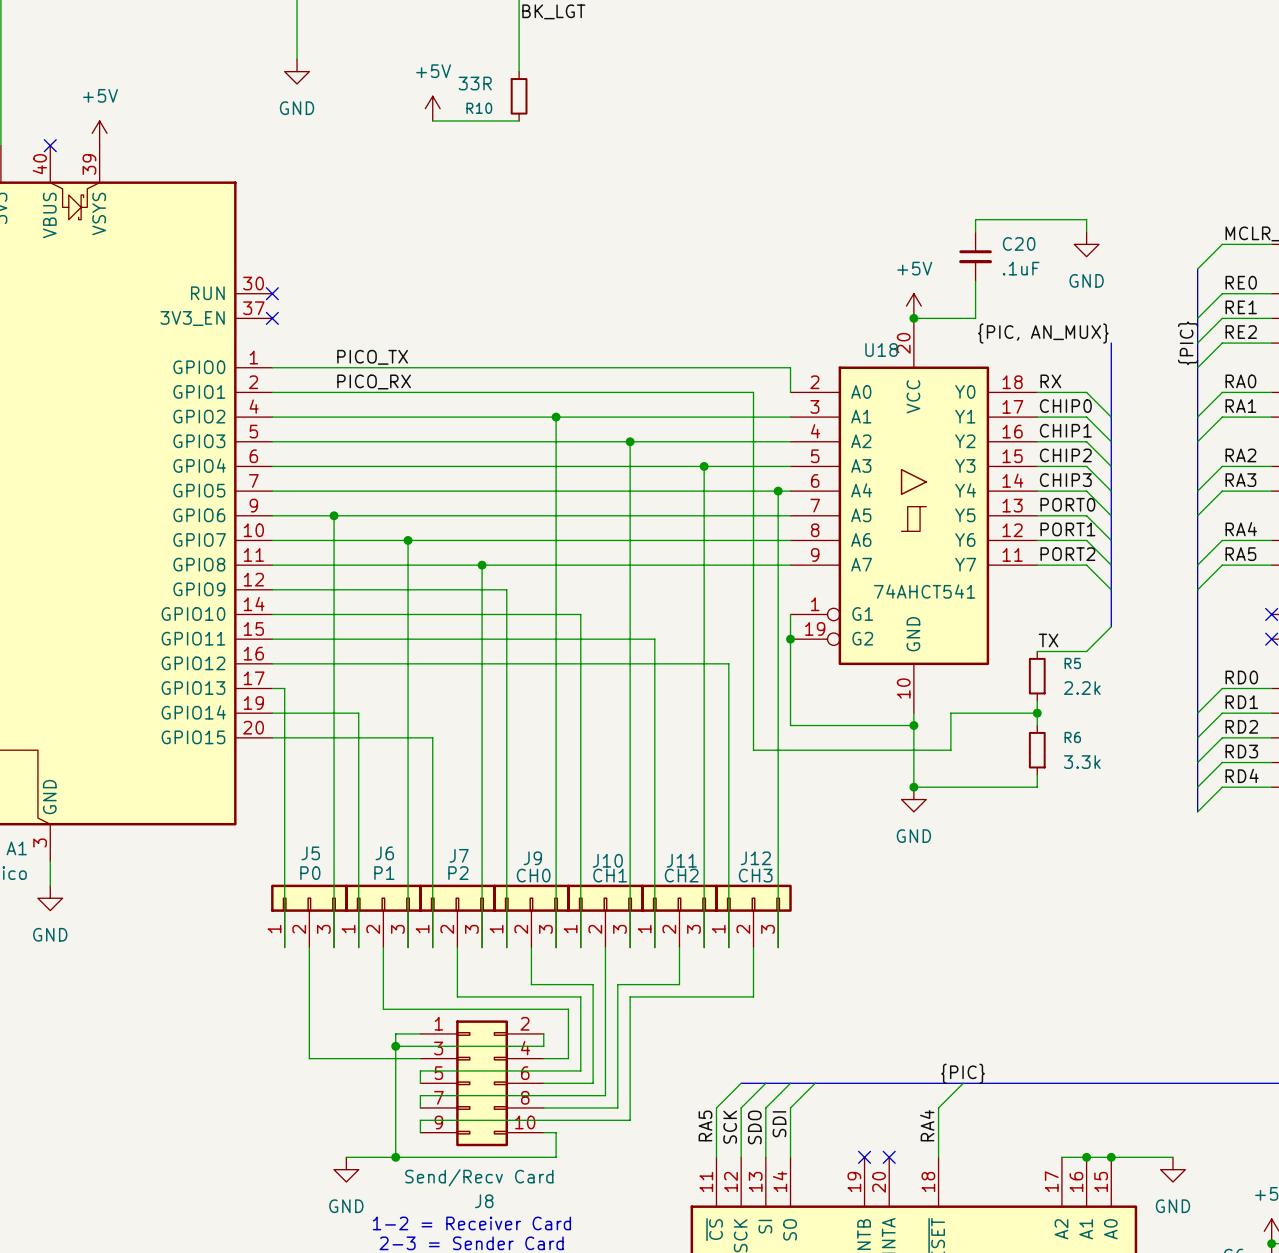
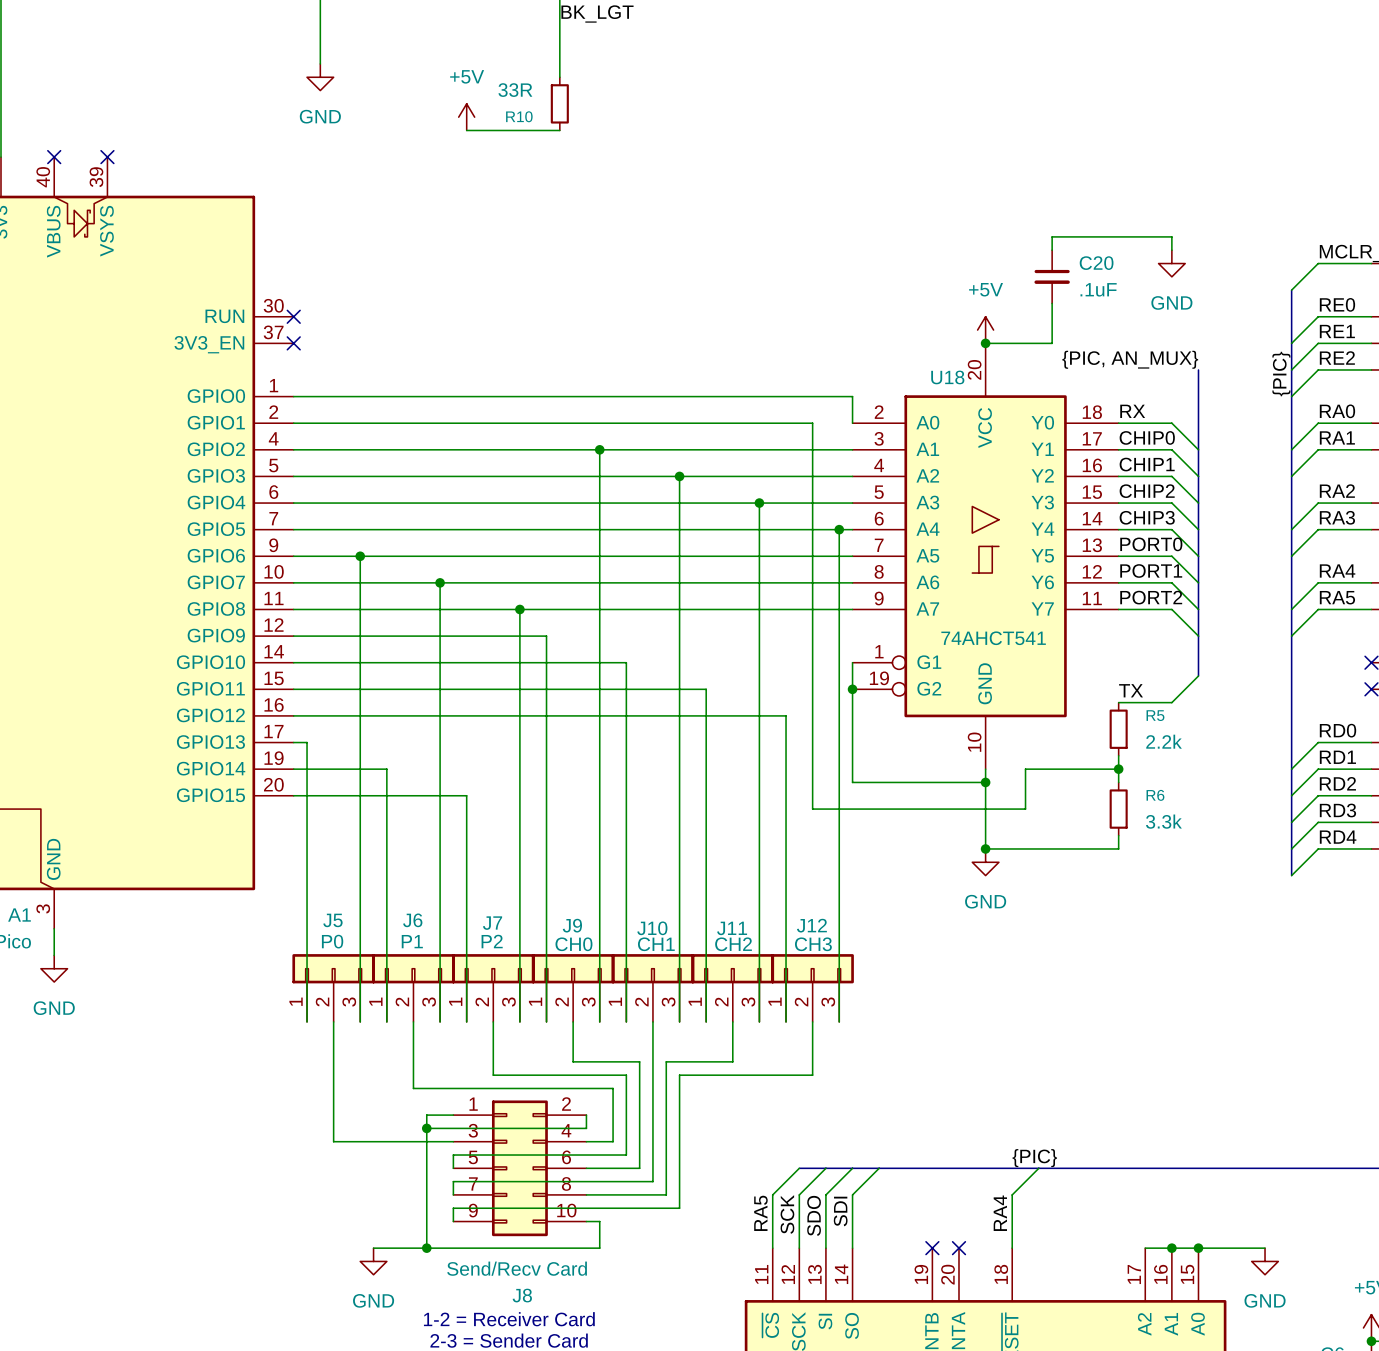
power symbol: +5V (99, 133) -> none
no-connect mark: none -> (107, 157)
label: PICO_TX (372, 357) -> none
label: PICO_RX (374, 381) -> none

